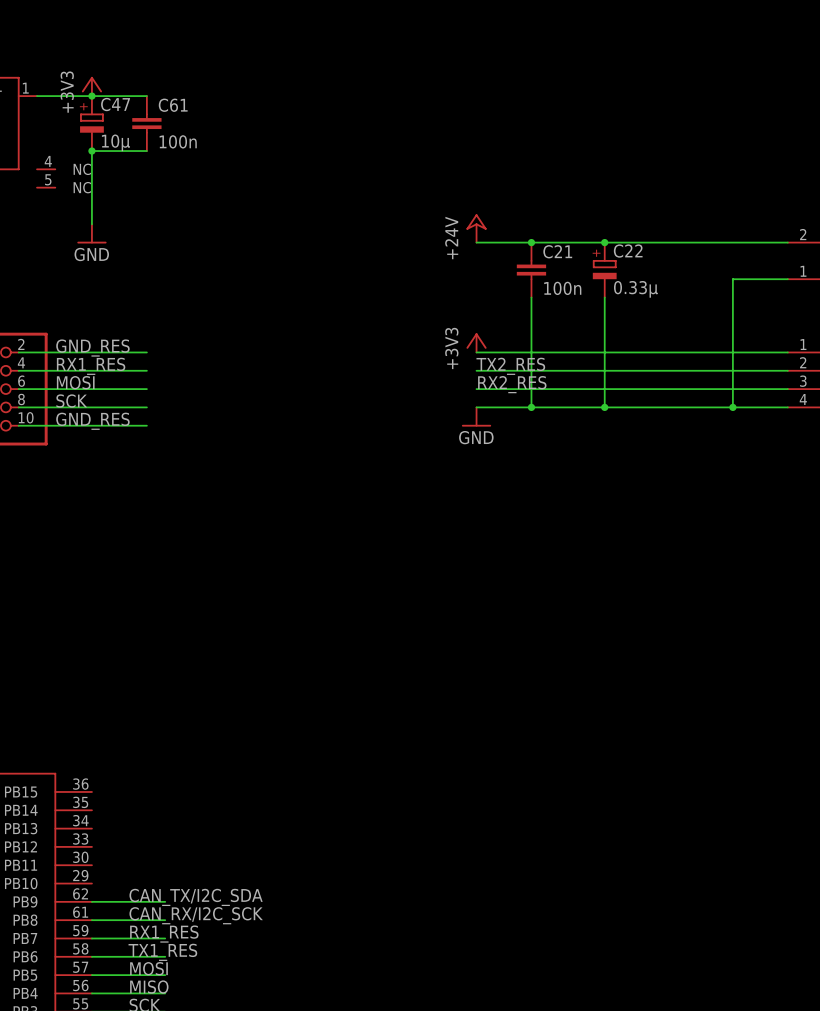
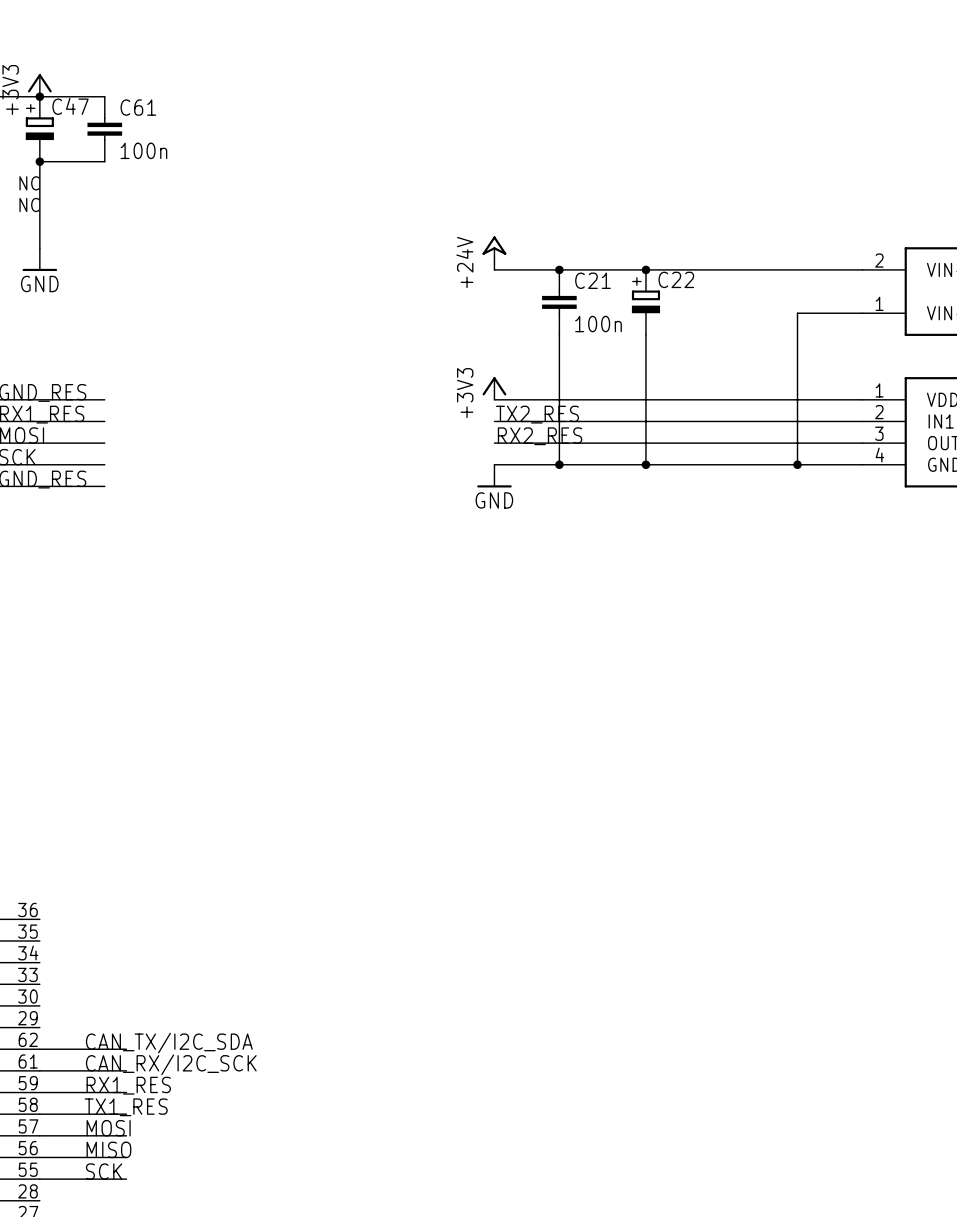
C47 value: 10µ (115, 142) -> none
C22 value: 0.33µ (635, 289) -> none

